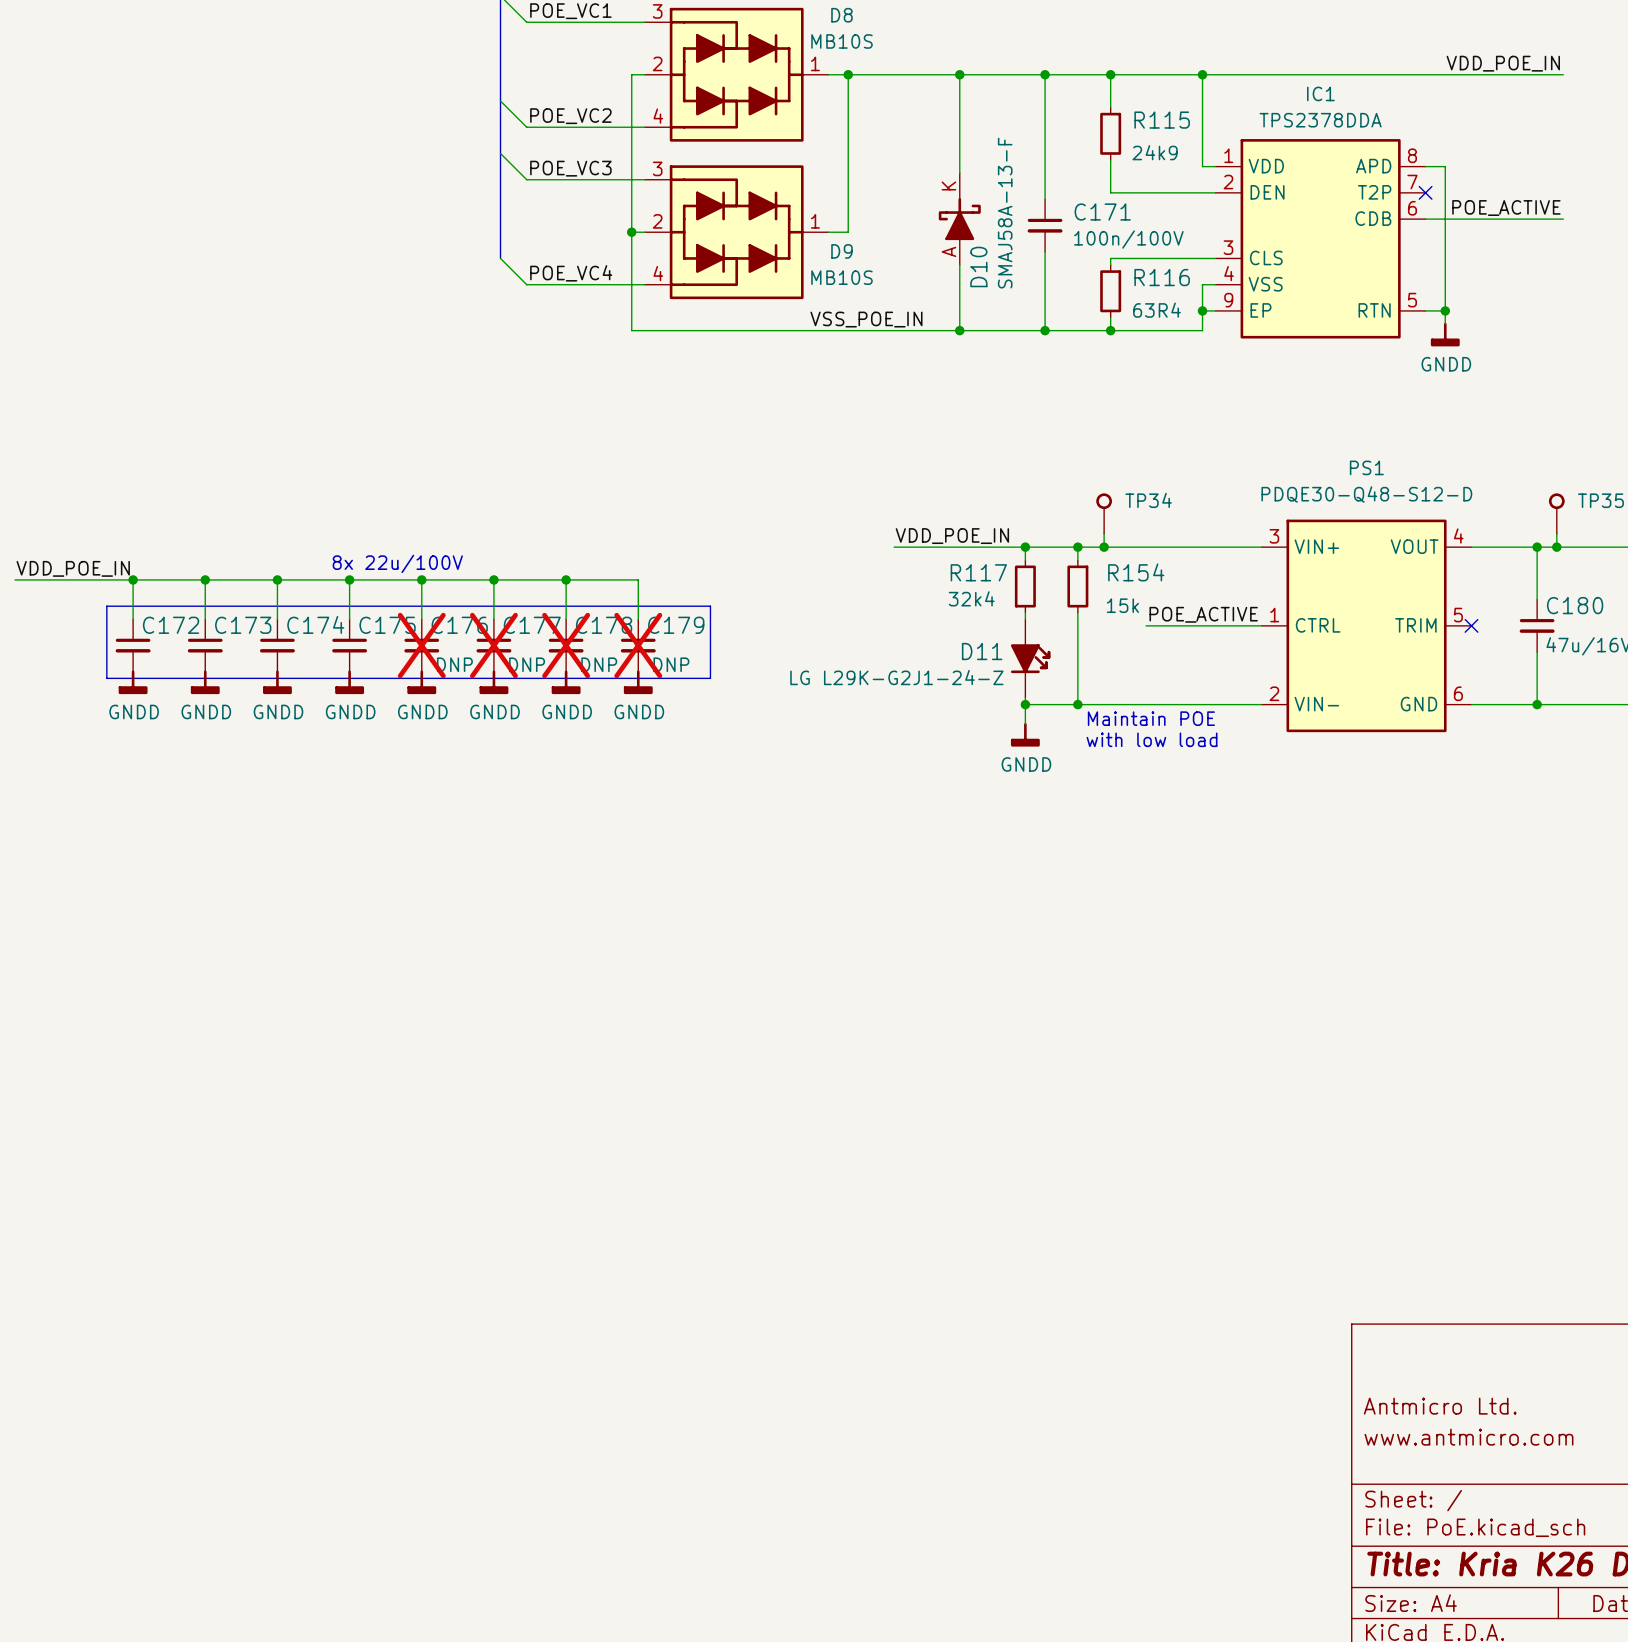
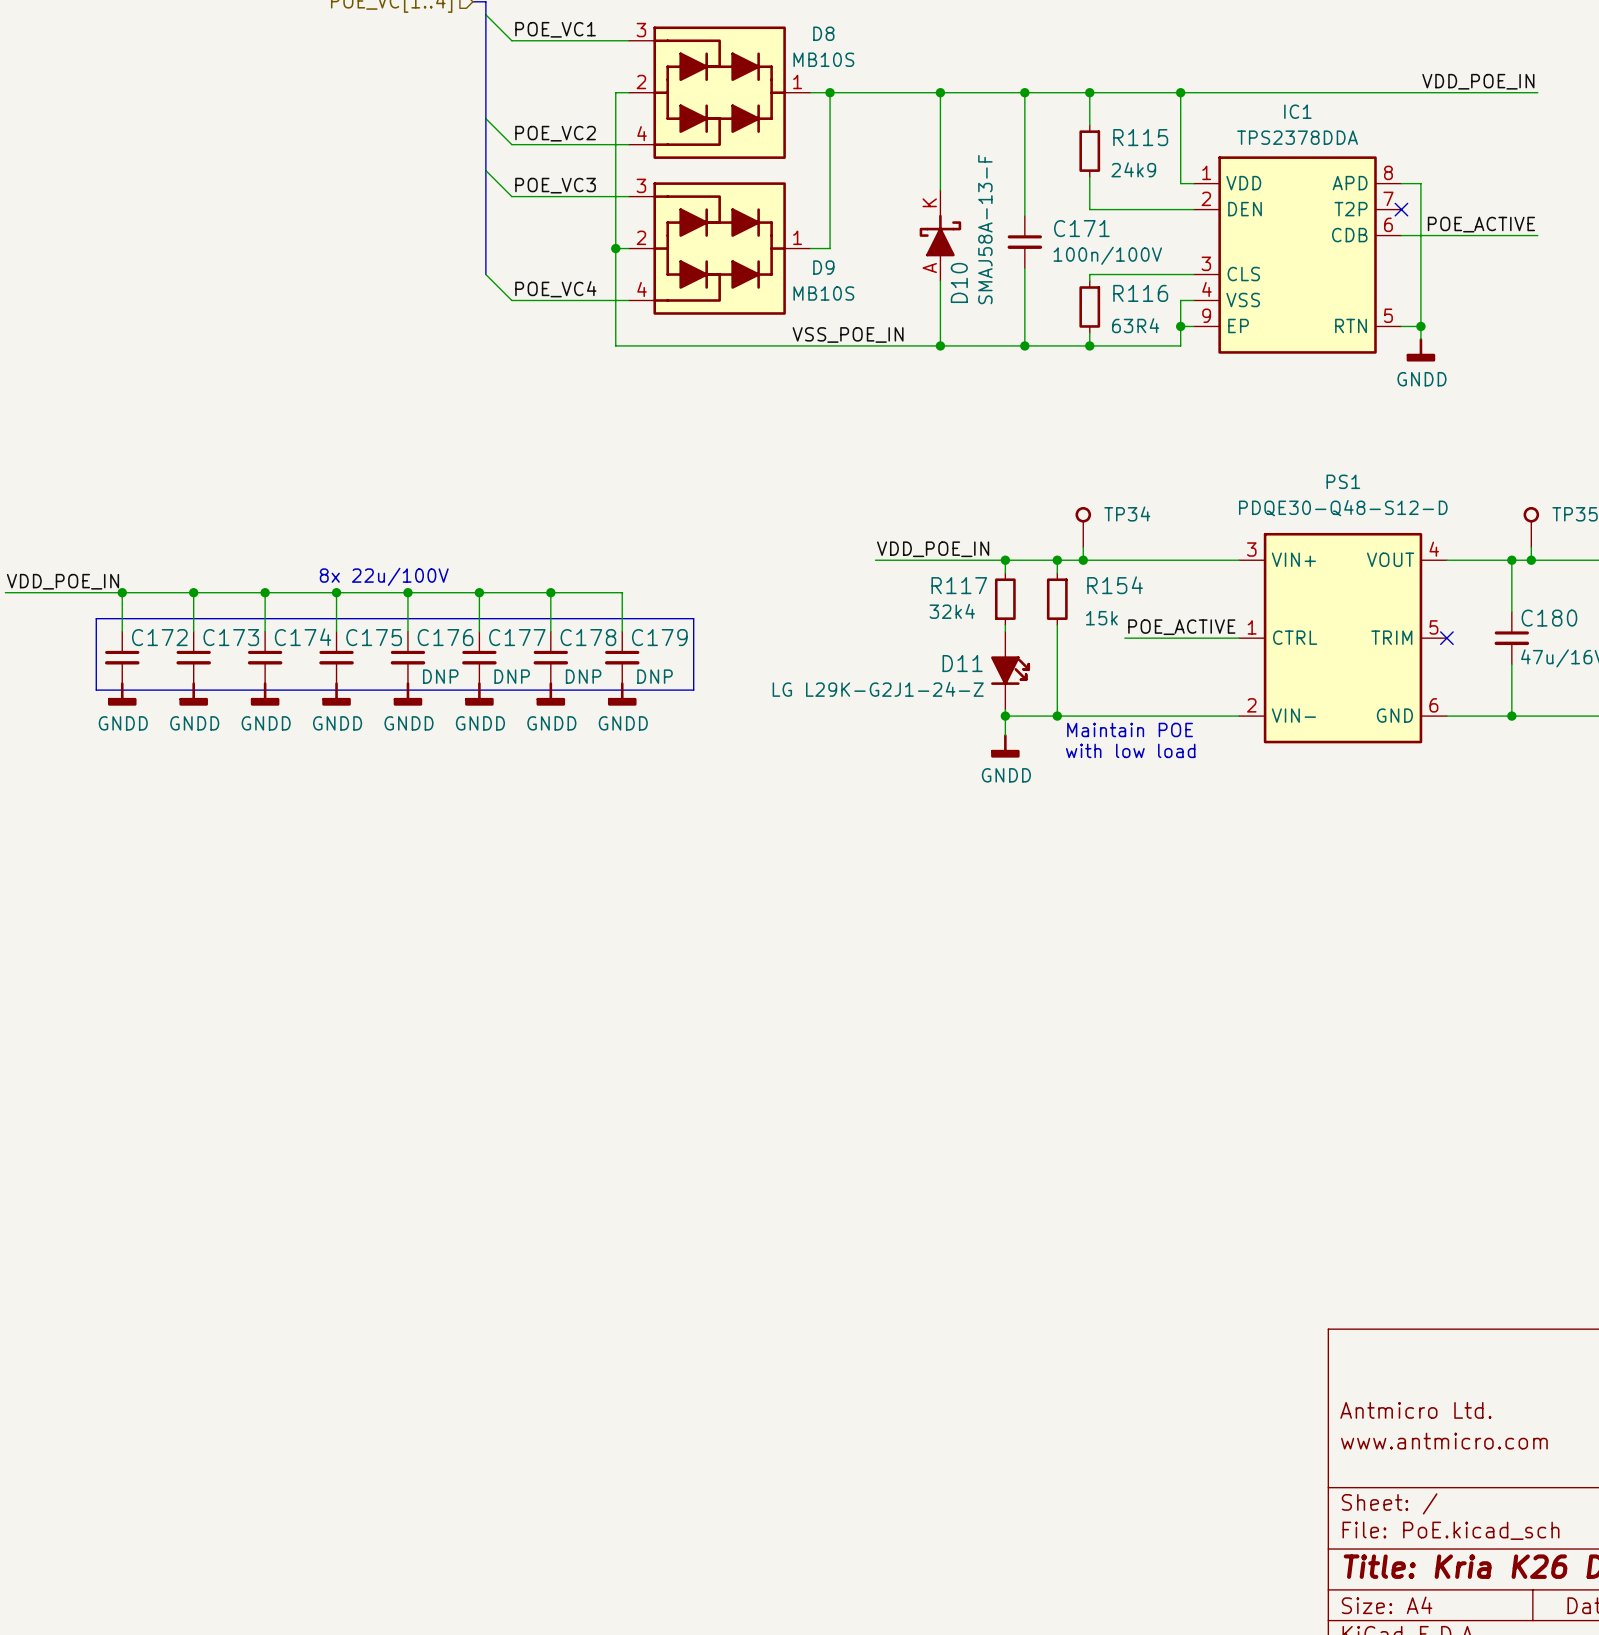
C176 do-not-place cross: (421, 645) -> none
C177 do-not-place cross: (493, 645) -> none
C178 do-not-place cross: (566, 645) -> none
C179 do-not-place cross: (638, 645) -> none

